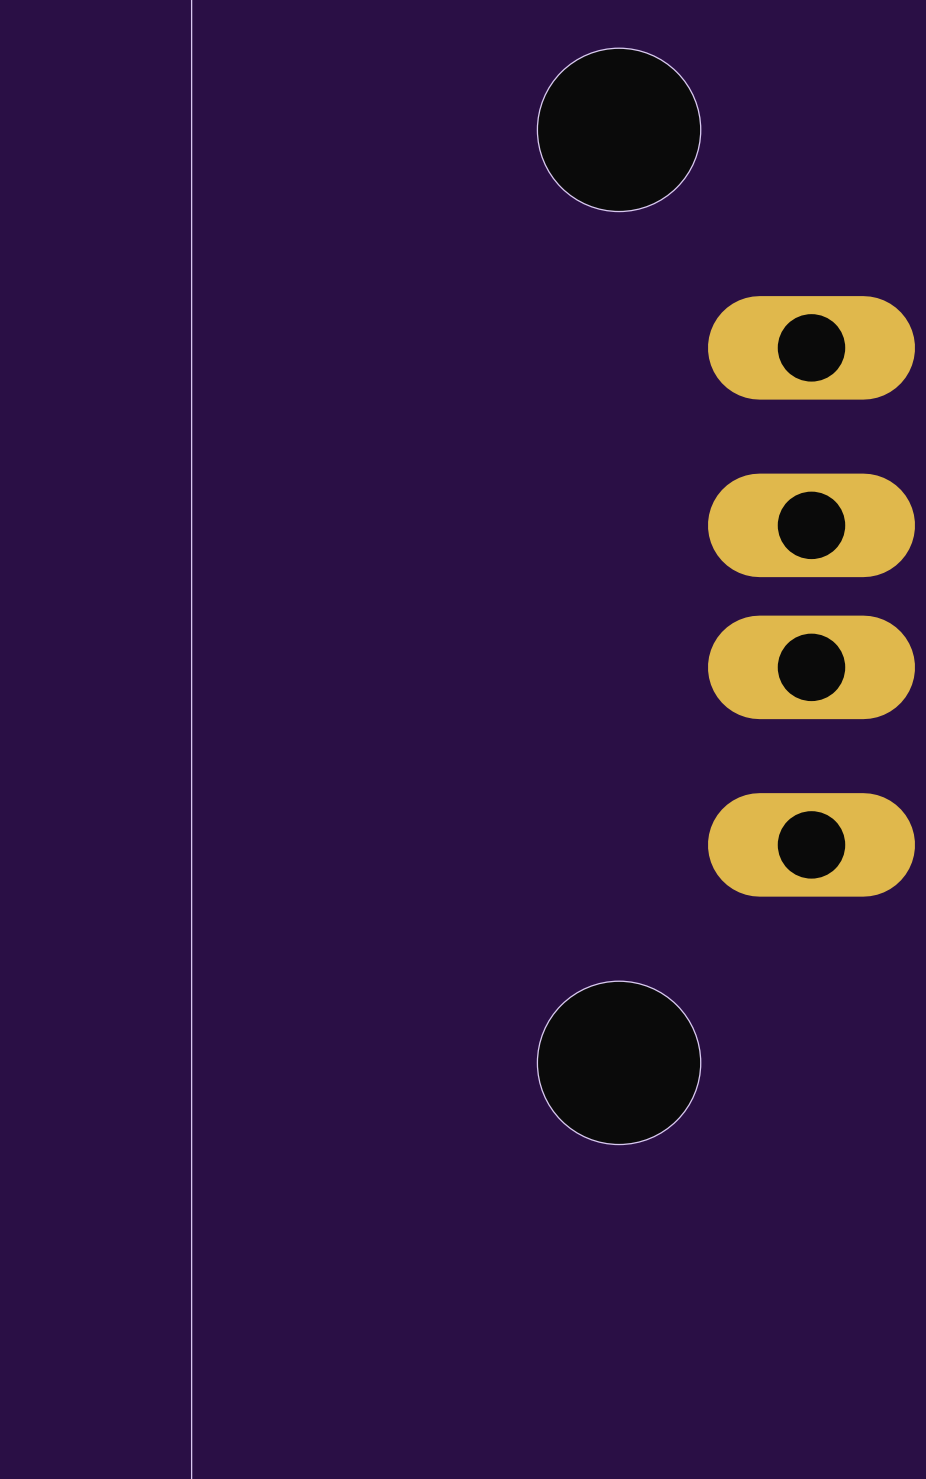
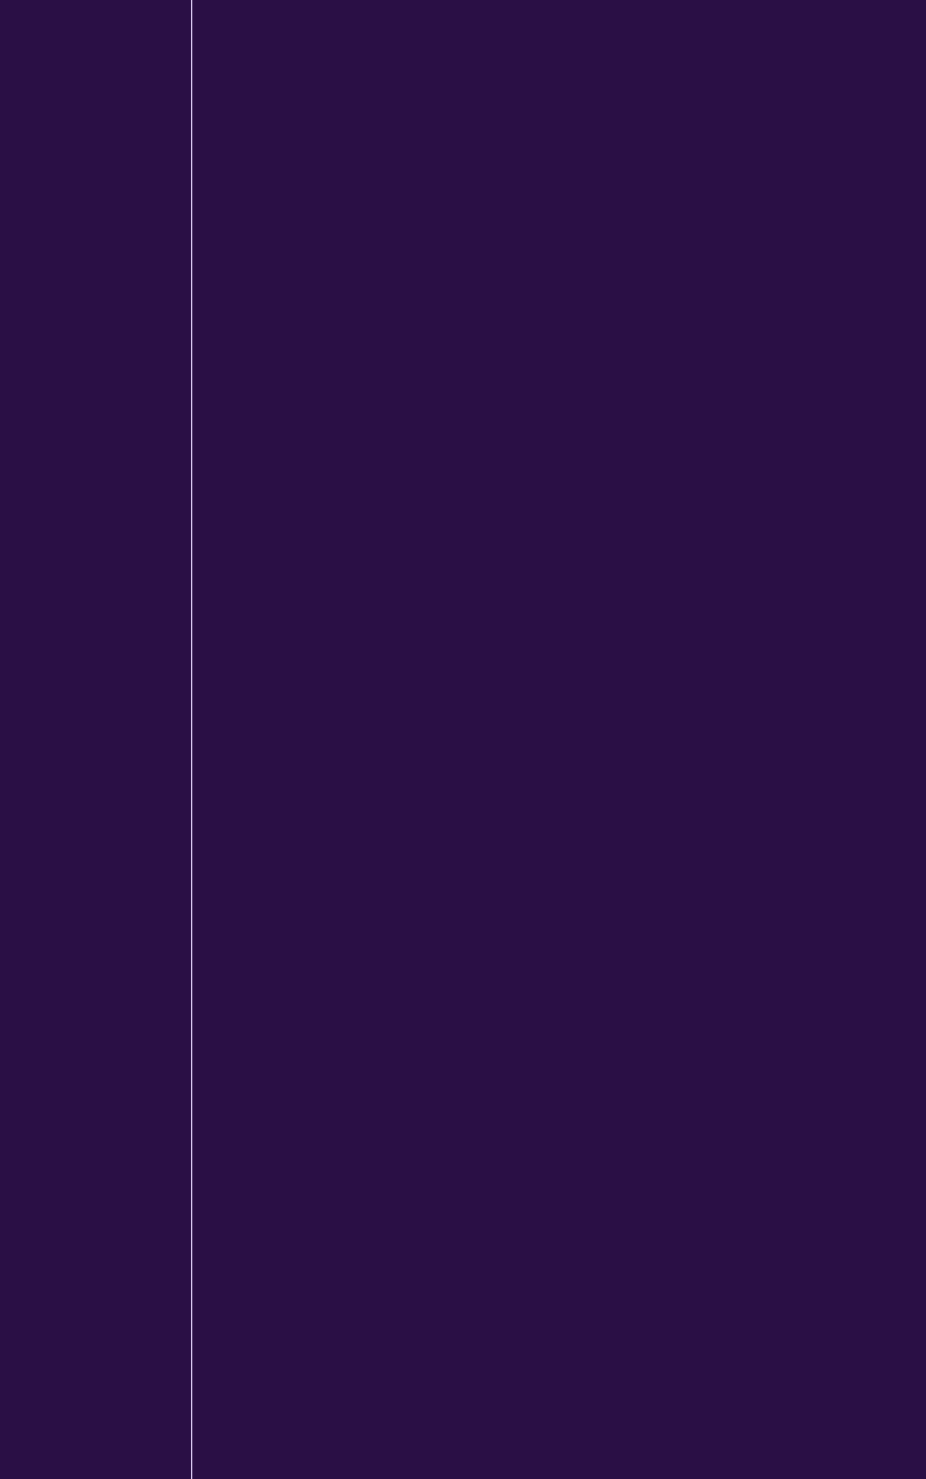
part: (726, 596) -> none

